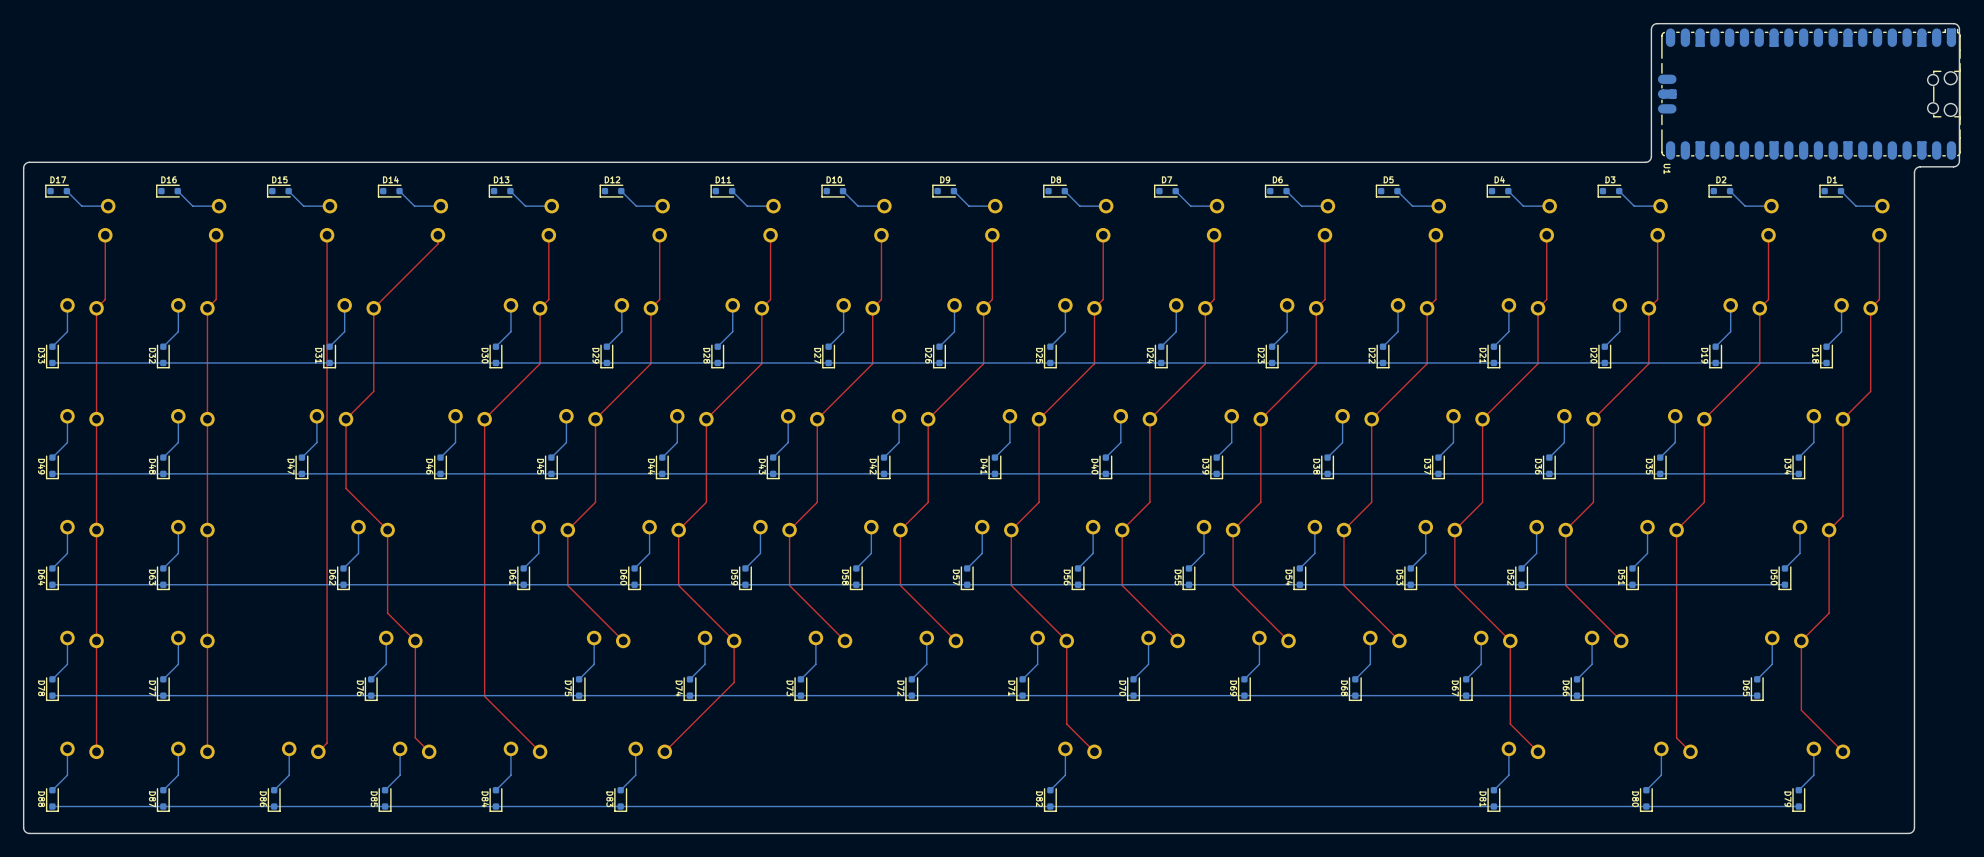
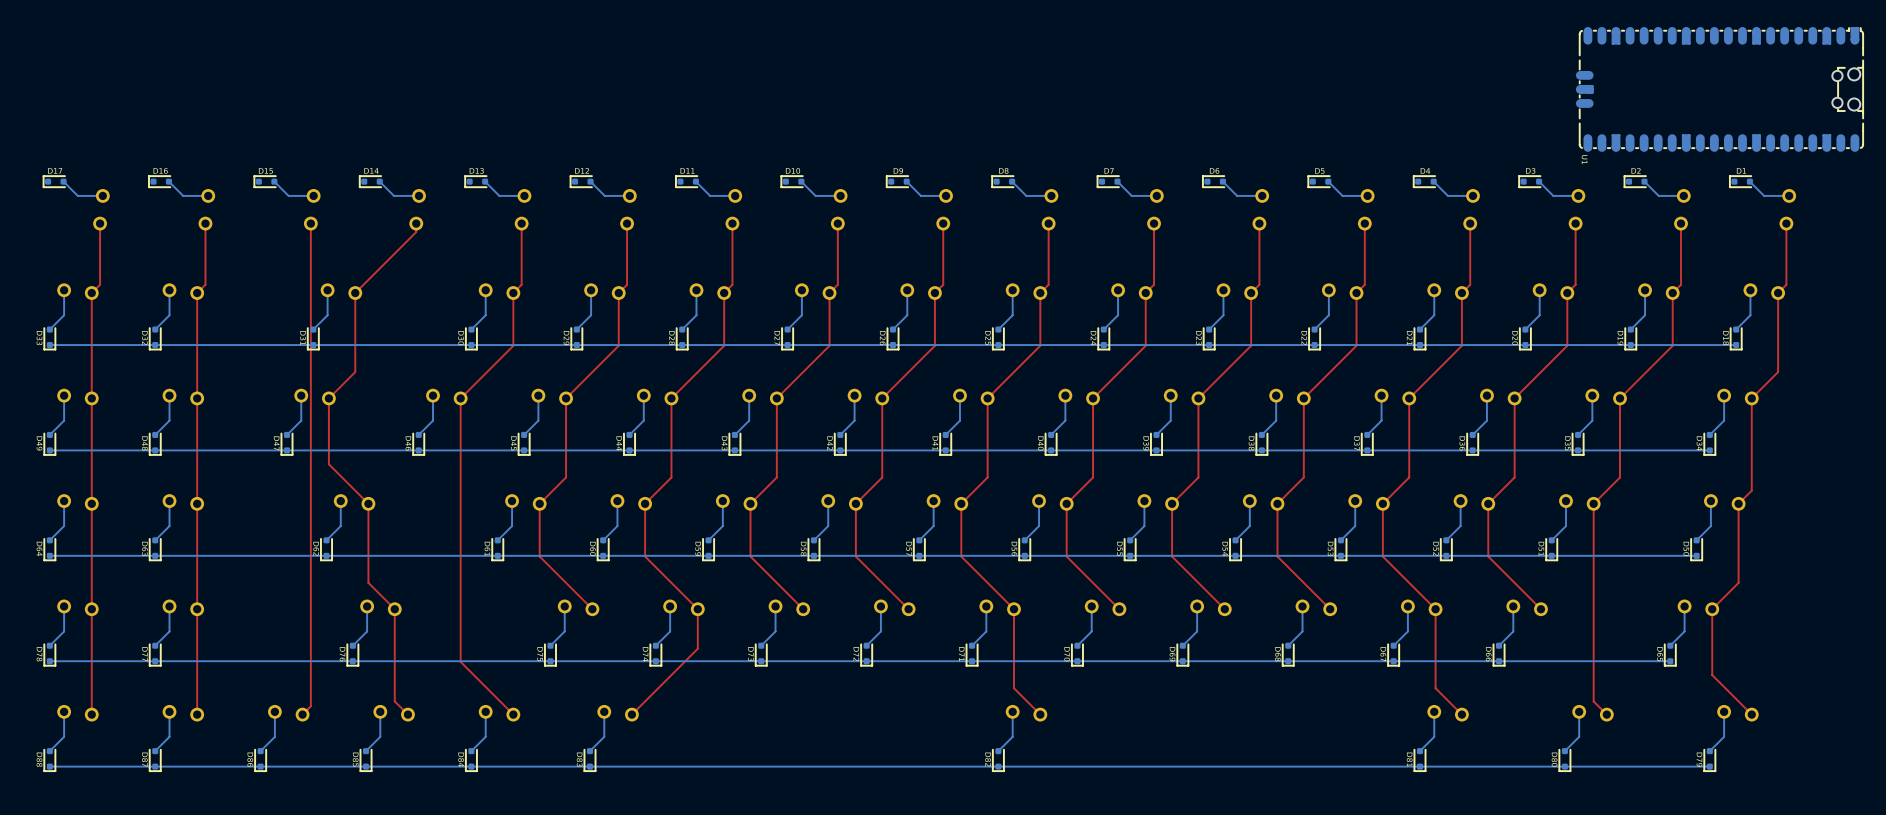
board edge: (1953, 23) (1655, 24) (1651, 29) (1651, 157) (1646, 162) (27, 162) (23, 168) (24, 829) (29, 833) (1910, 832) (1914, 827) (1914, 172) (1918, 166) (1954, 166) (1959, 162) (1959, 29) (1957, 25) (1953, 23) -> none

